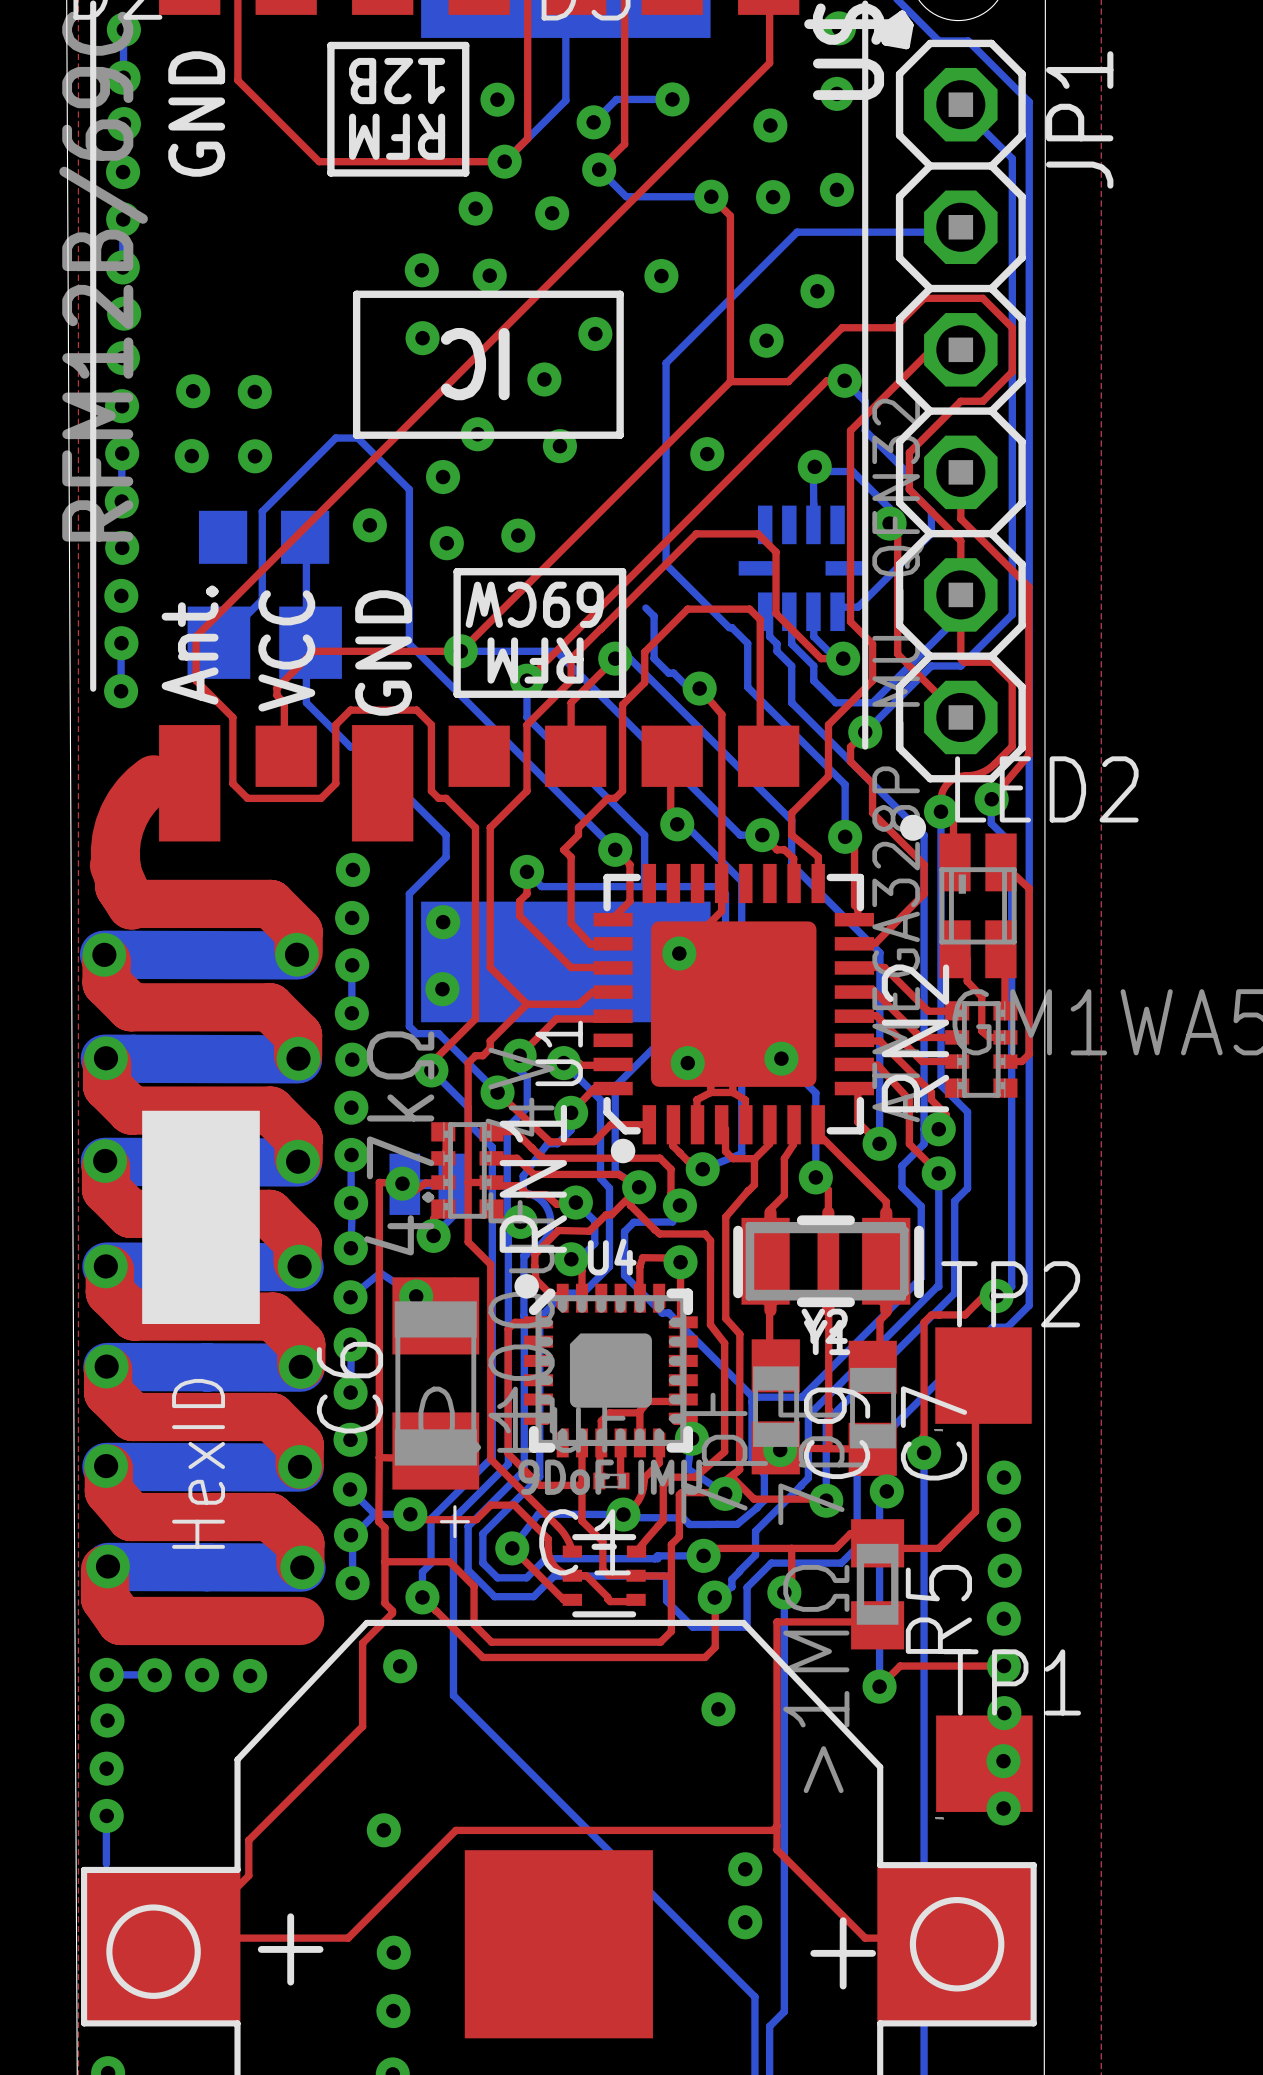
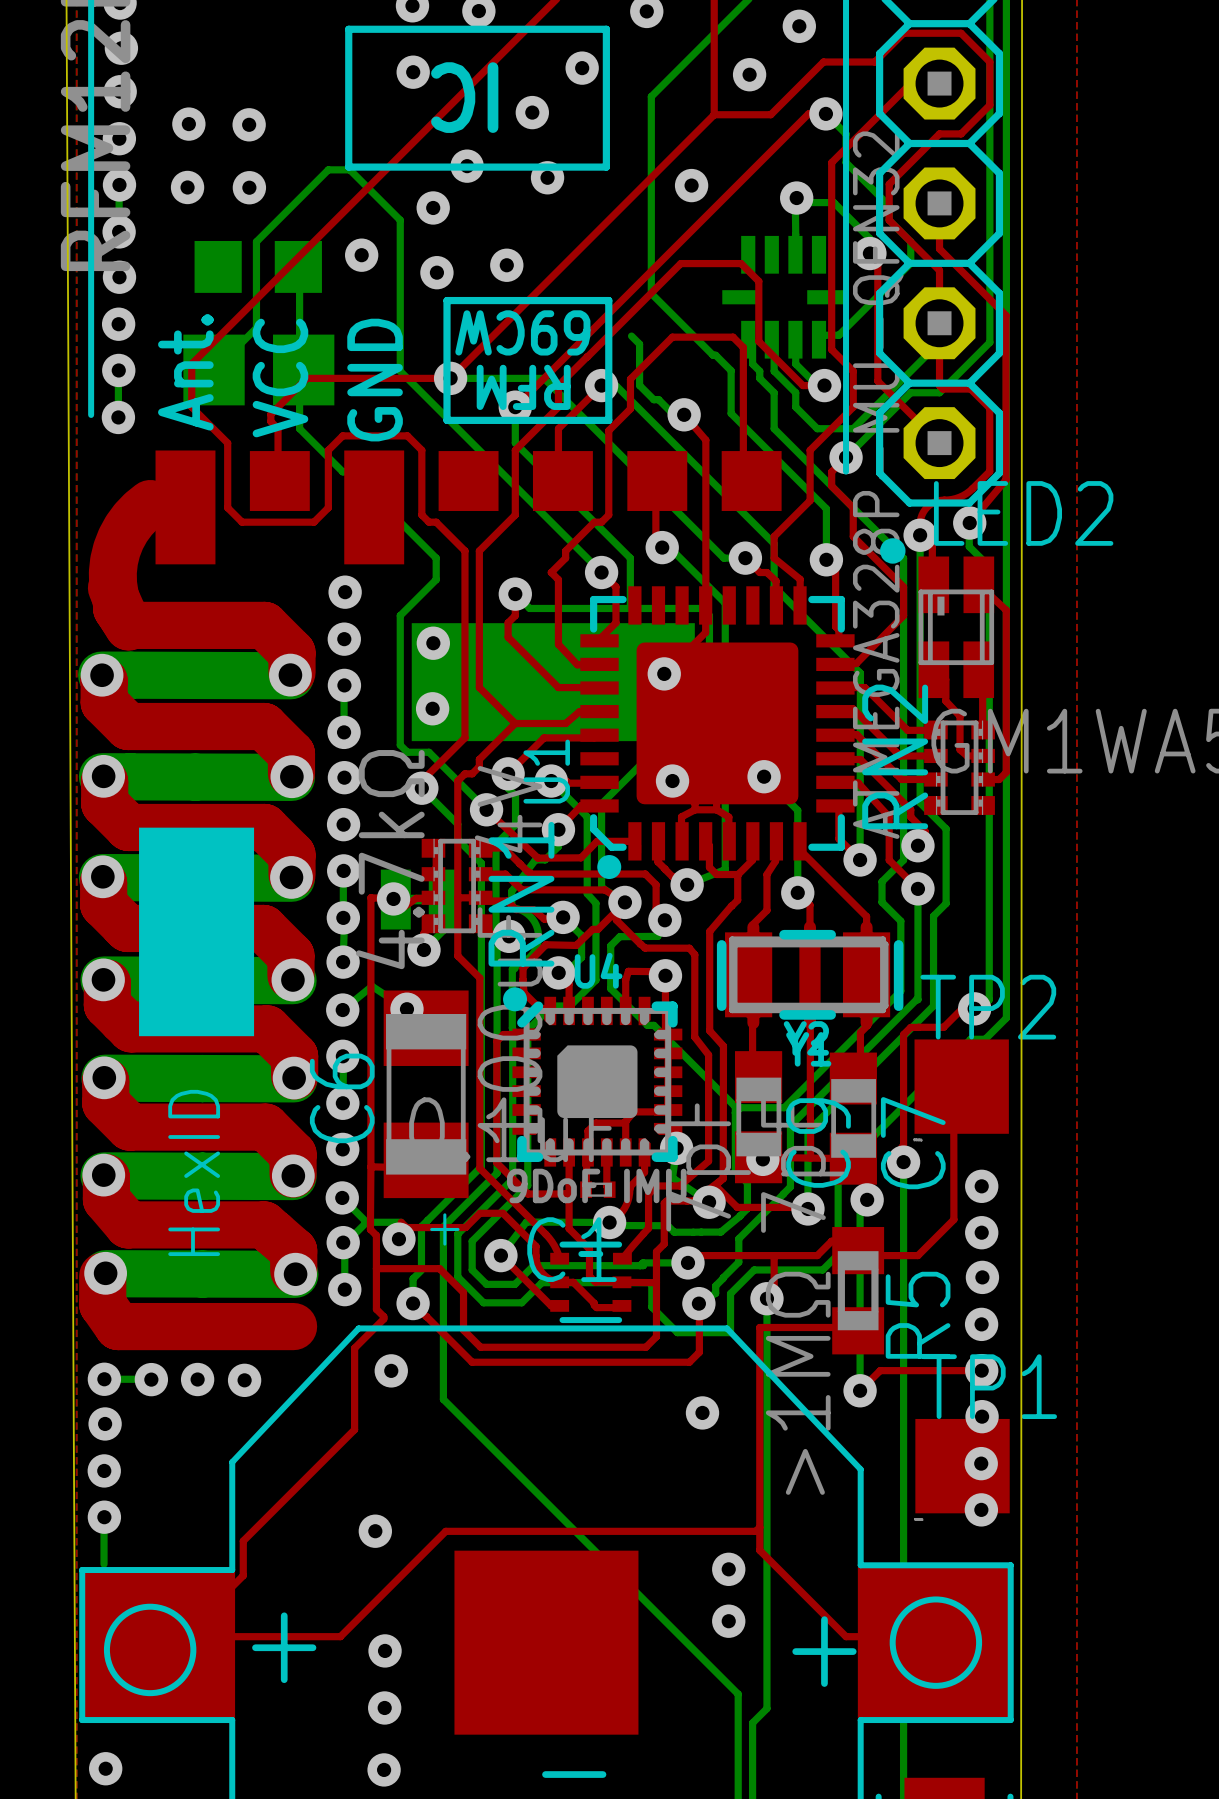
via position: (410, 1514) -> (398, 1239)

